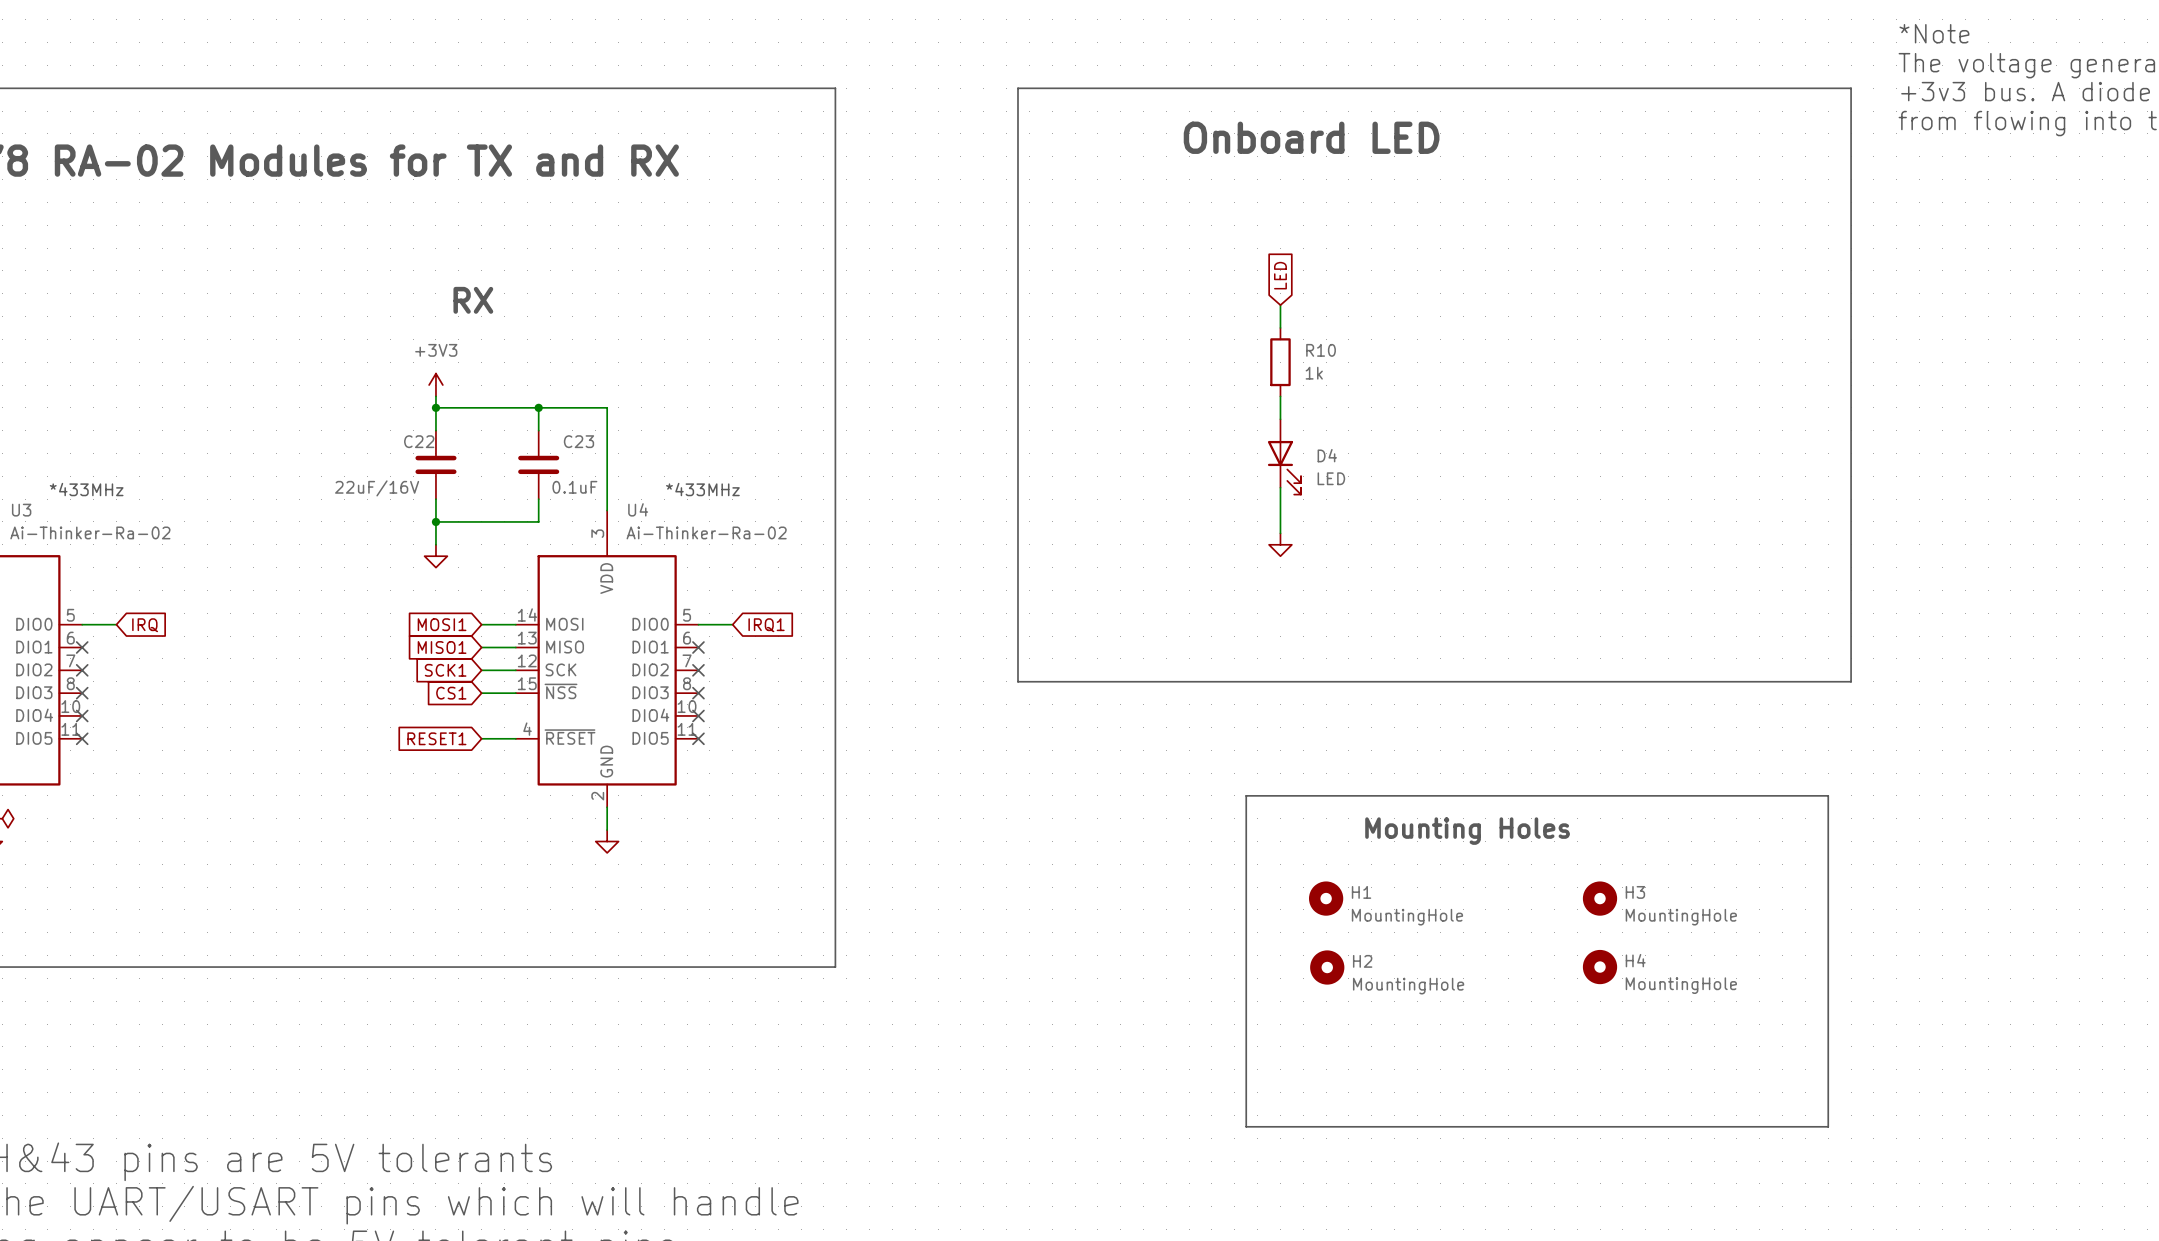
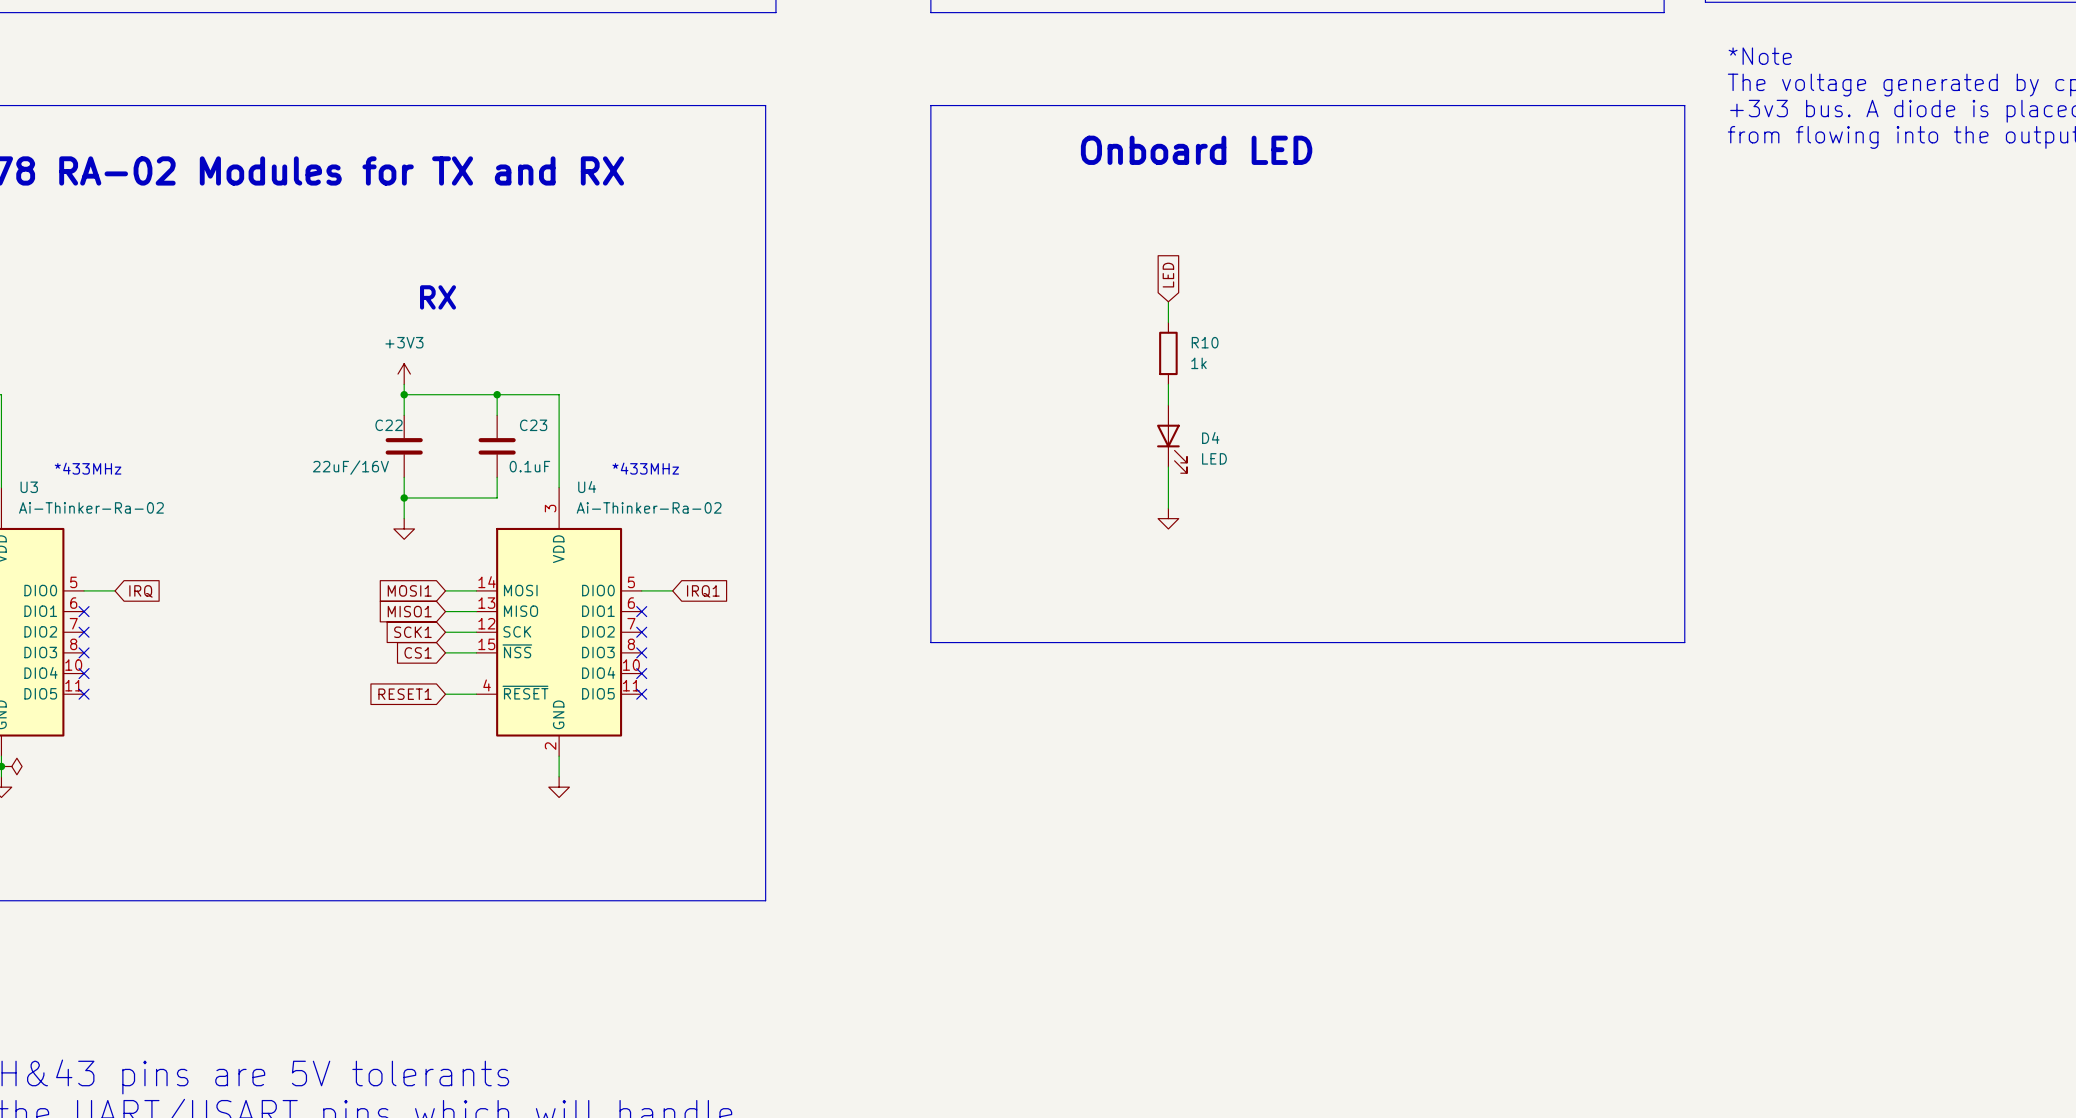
line: (1246, 795) (1828, 795) (1828, 1126) (1246, 1126) (1246, 795) -> none
text: Mounting Holes (1467, 831) -> none
H1: MountingHole (1326, 898) -> none
H3: MountingHole (1600, 898) -> none
H2: MountingHole (1327, 967) -> none
H4: MountingHole (1600, 967) -> none

